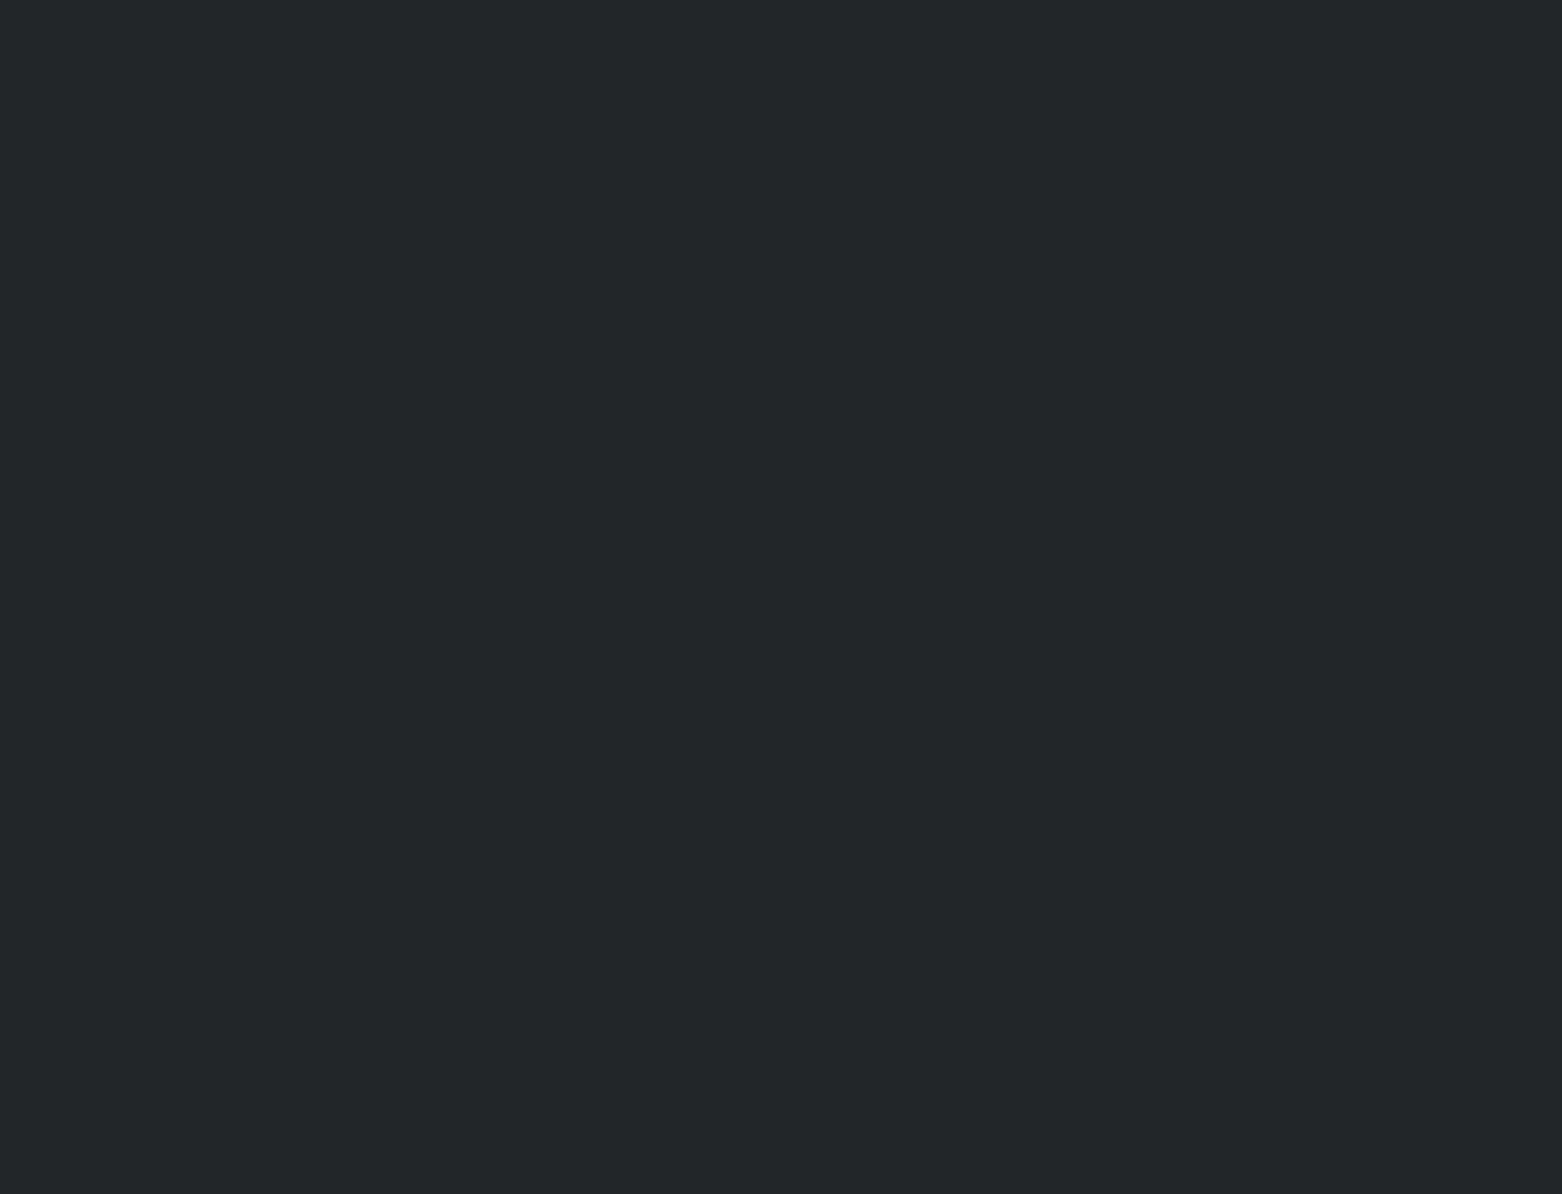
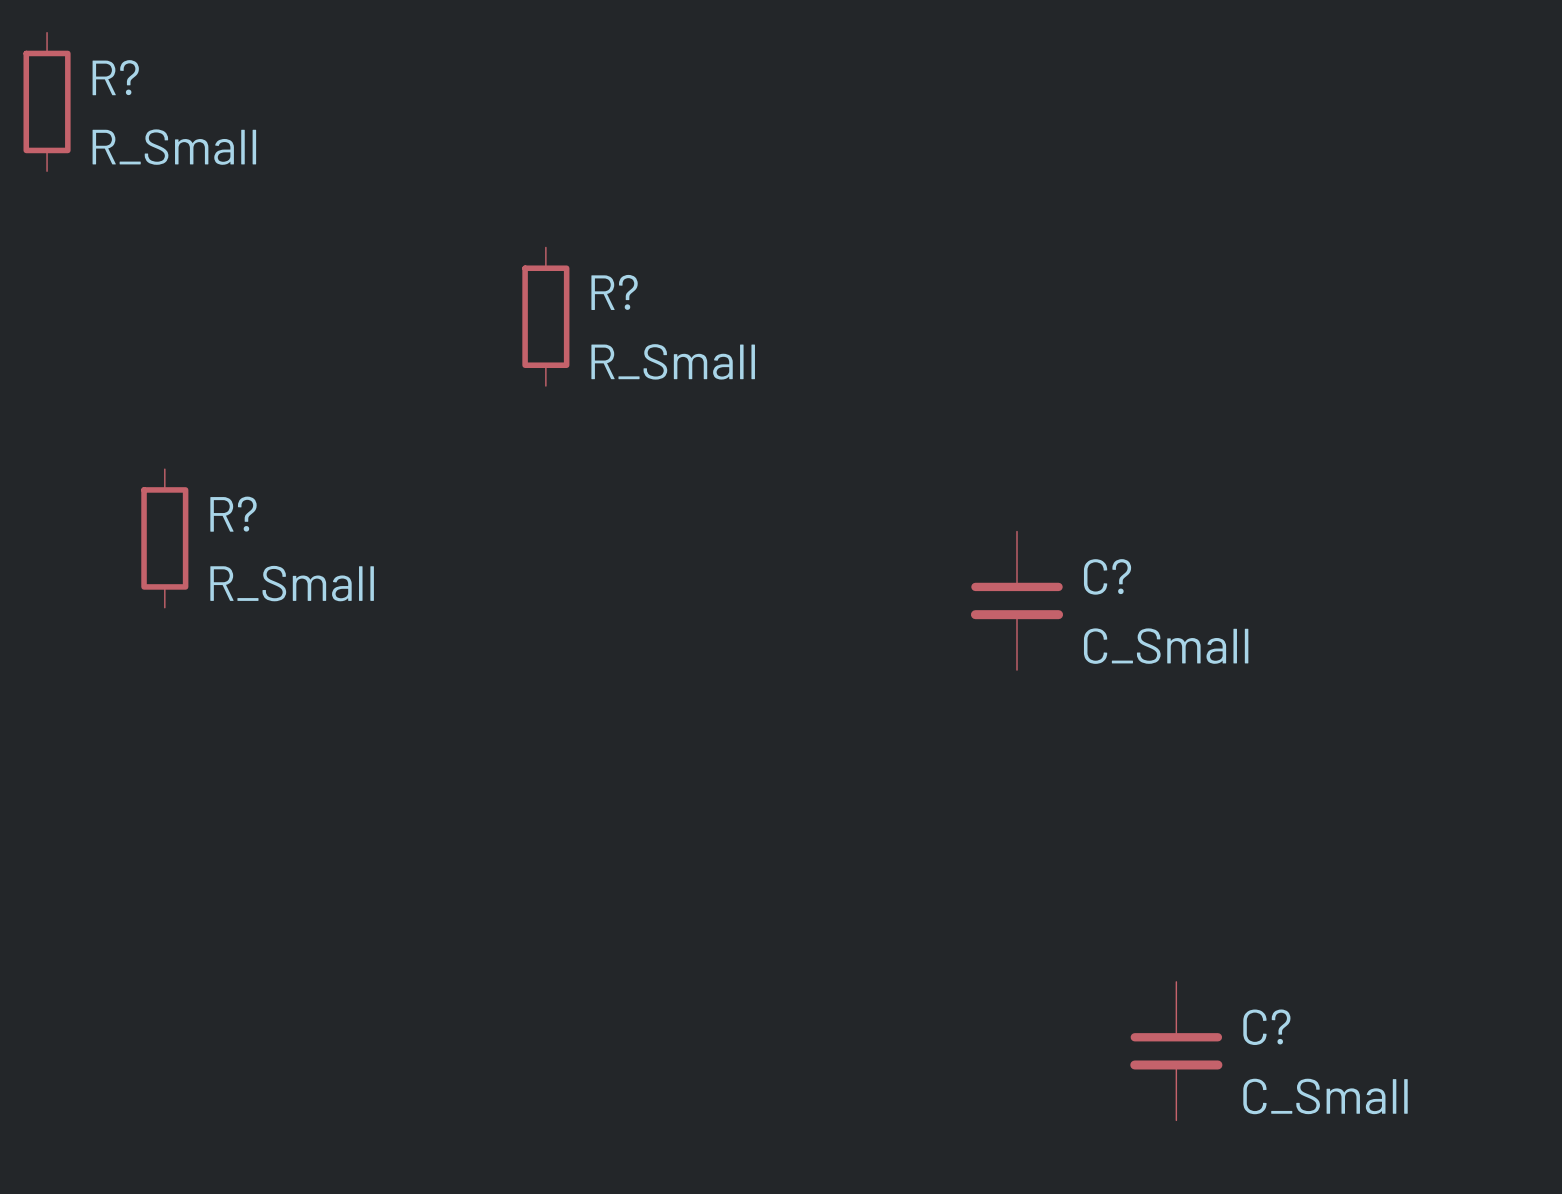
R?: none -> R_Small (47, 101)
R?: none -> R_Small (545, 316)
R?: none -> R_Small (164, 538)
C?: none -> C_Small (1016, 600)
C?: none -> C_Small (1176, 1051)

